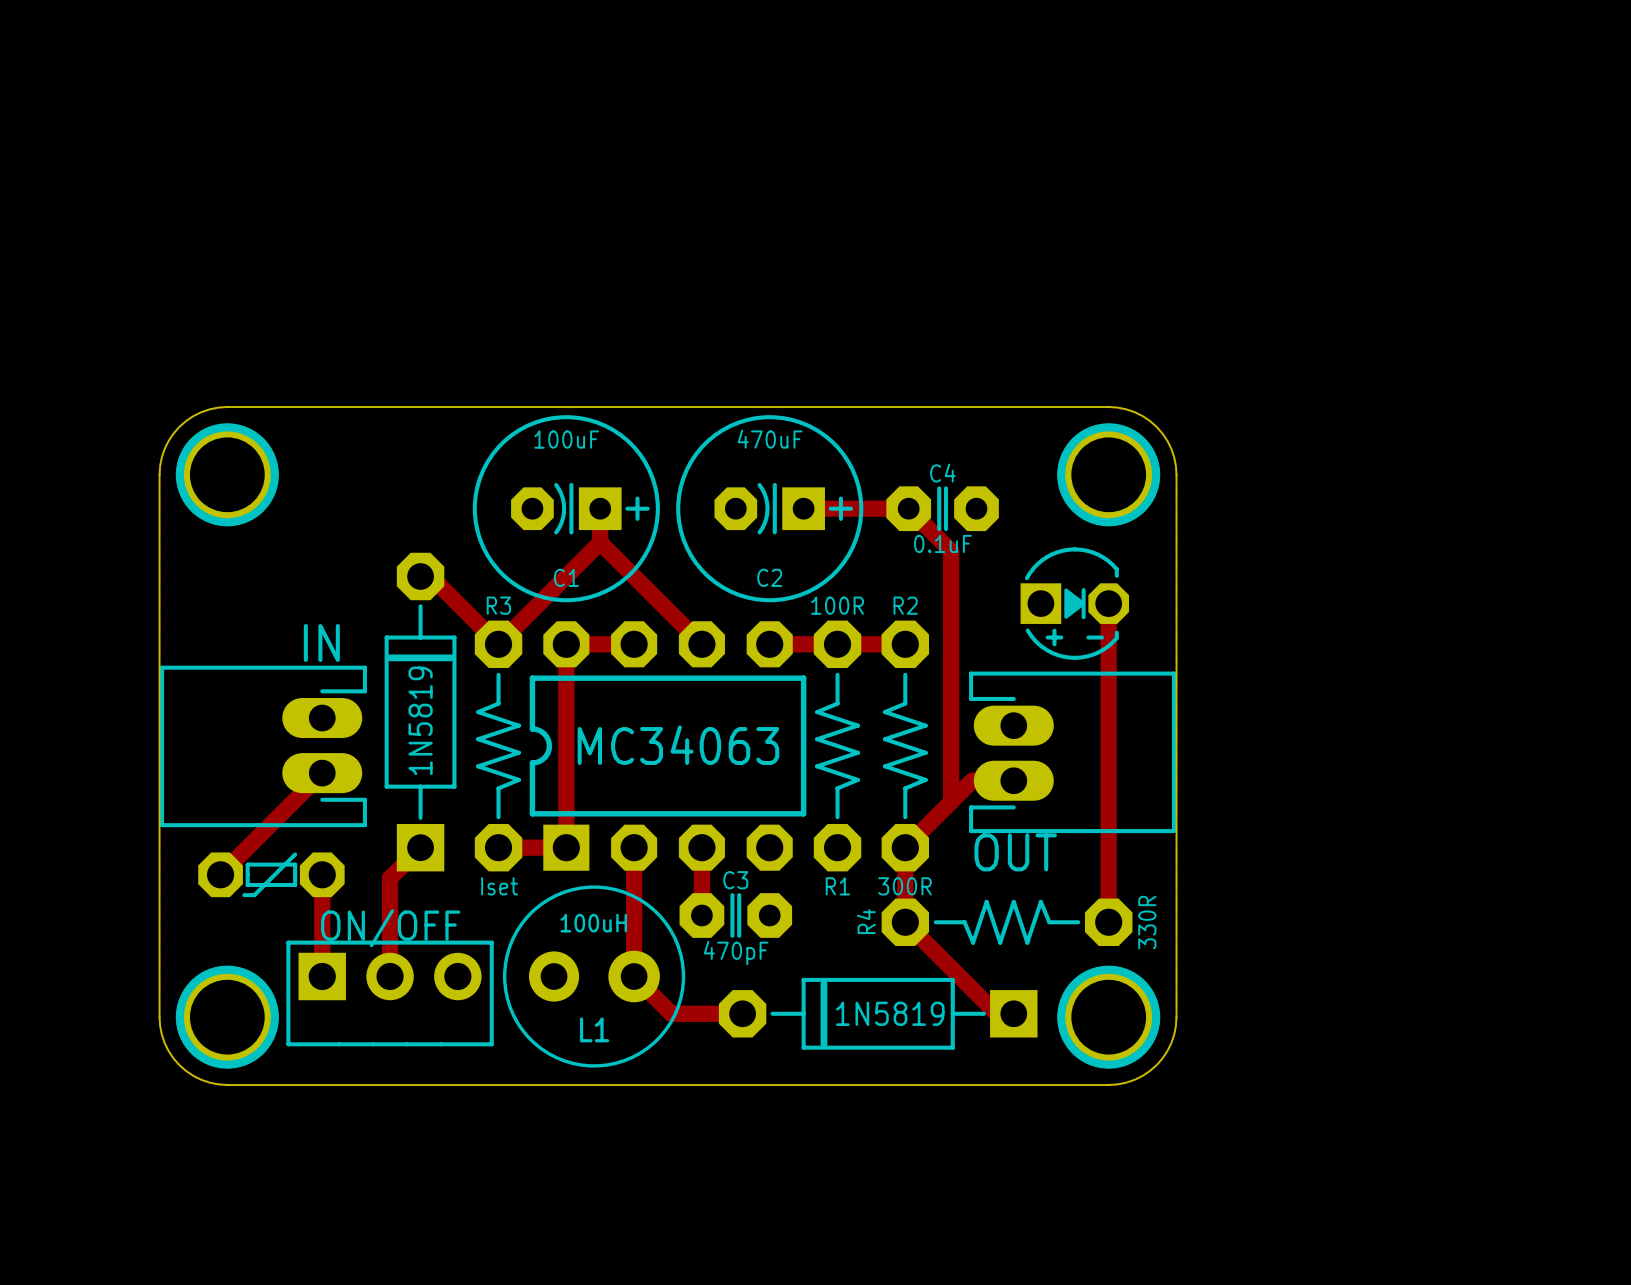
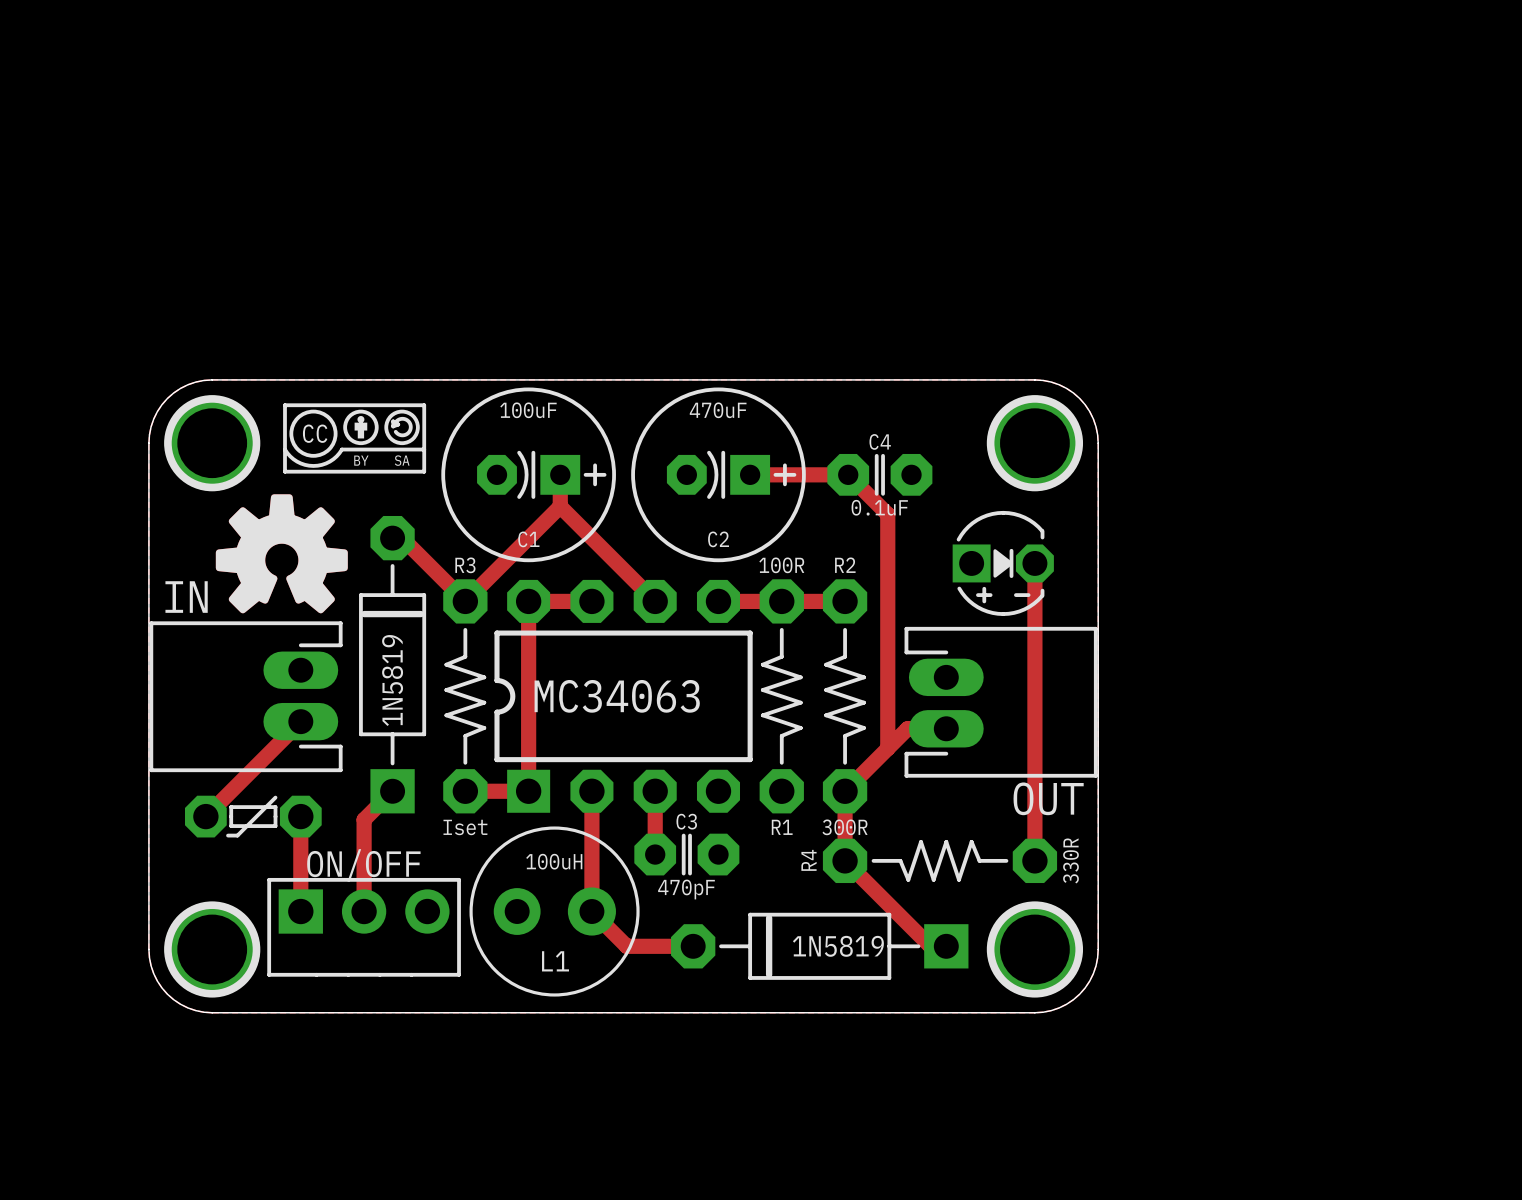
drawing: none -> [215, 403, 427, 614]
IN name position: IN (321, 642) -> IN (186, 597)
OUT name position: OUT (1015, 852) -> OUT (1048, 798)

